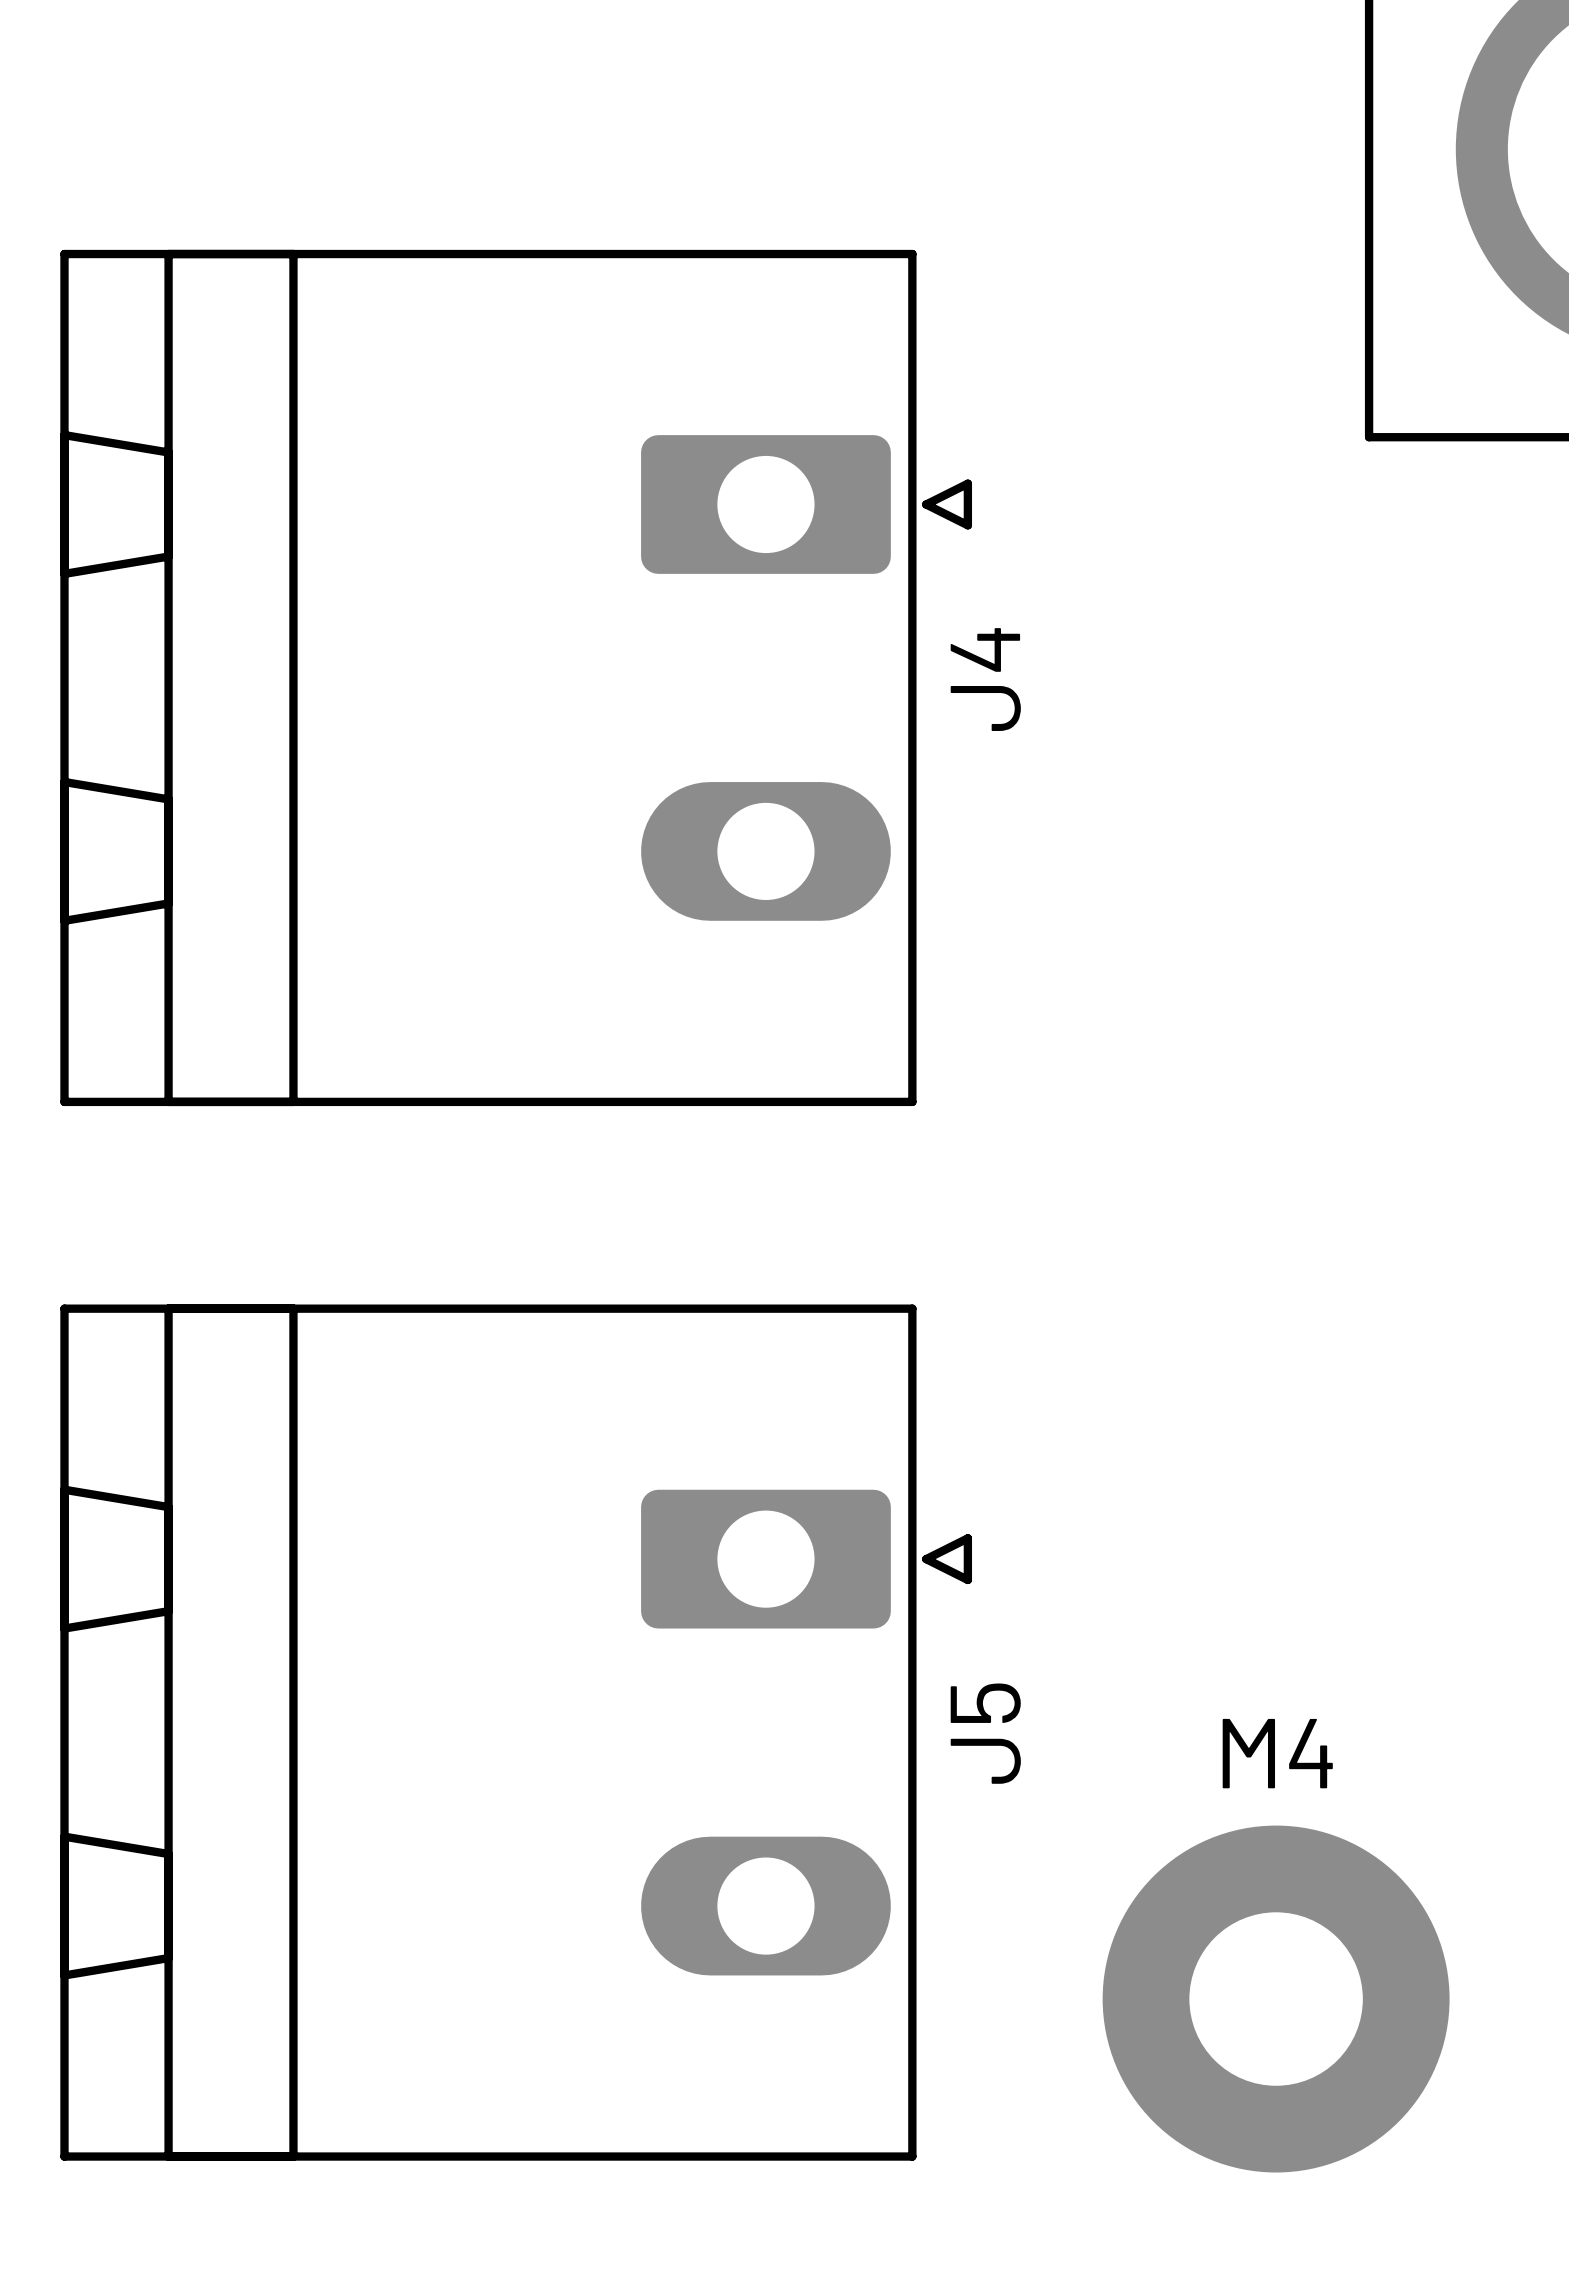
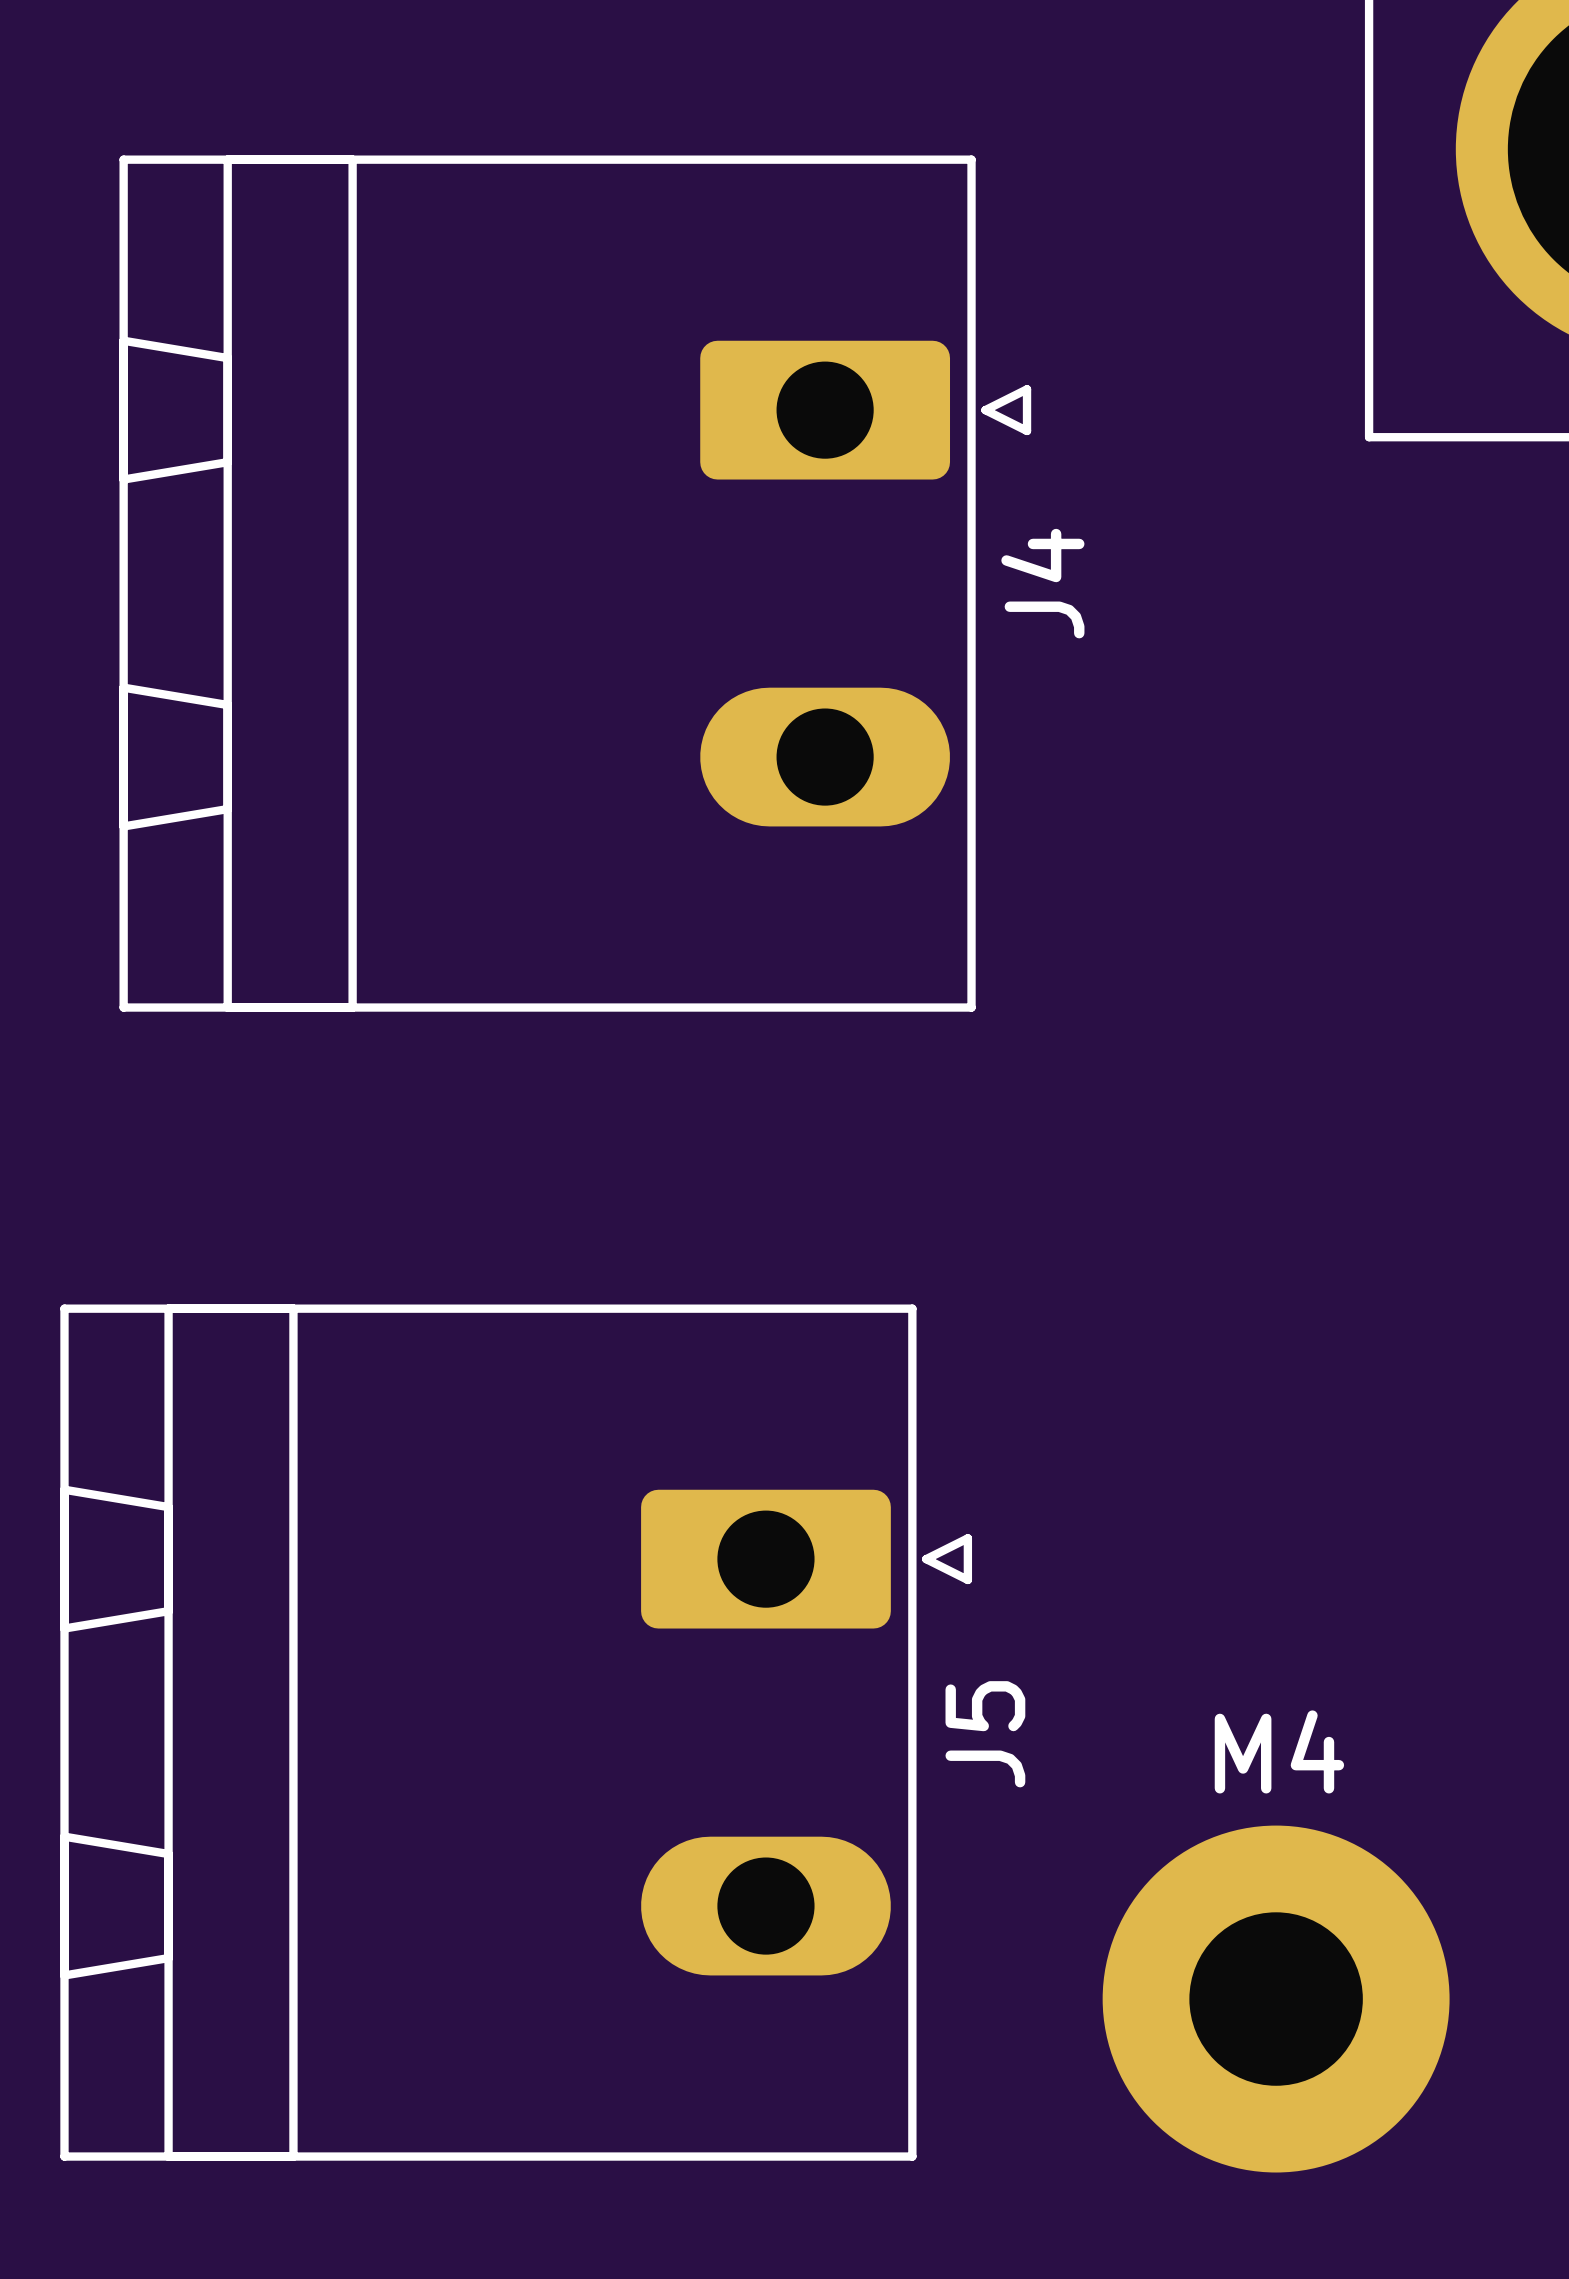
J4 position: (516, 677) -> (575, 583)

